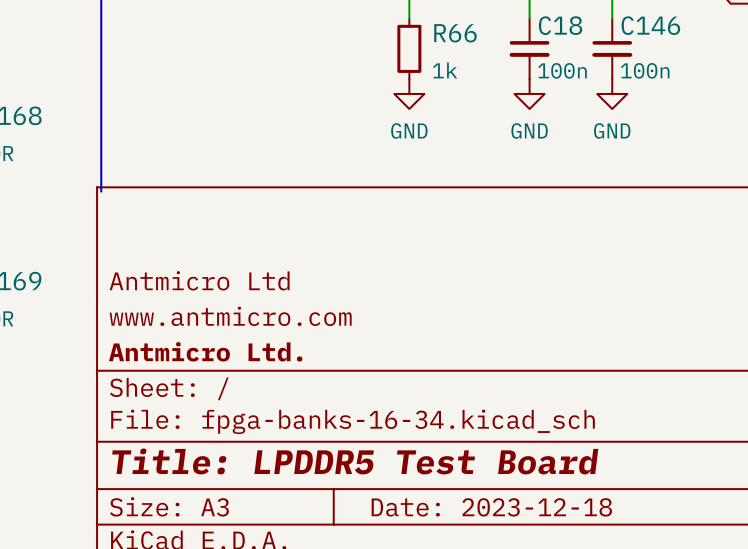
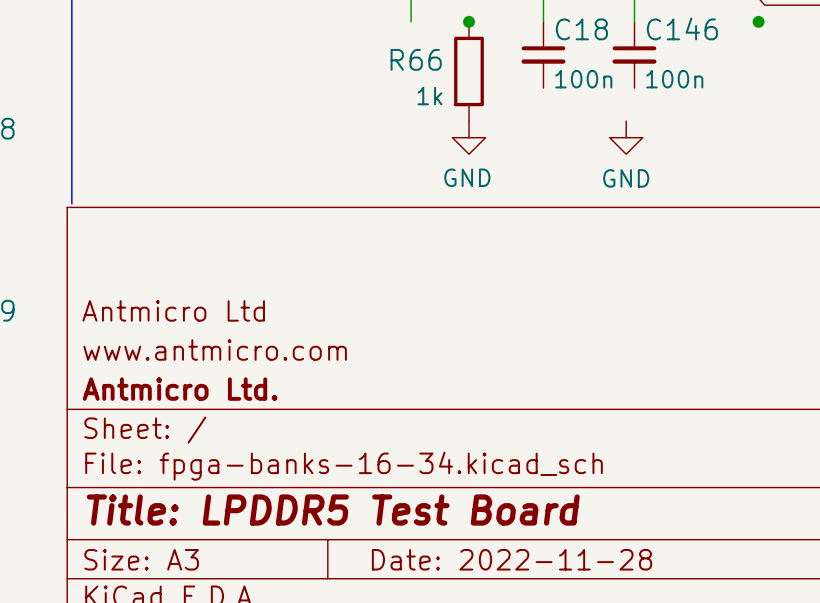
R66 symbol: [397, 18, 422, 79] -> [454, 21, 484, 122]
junction: none -> (469, 21)
junction: none -> (758, 21)
R66 name position: R66 (455, 33) -> R66 (416, 59)
R66 text position: 1k (445, 70) -> 1k (429, 96)
power symbol: GND (409, 93) -> none
power symbol: GND (529, 93) -> none
power symbol position: GND (612, 93) -> GND (626, 137)
power symbol: none -> GND (469, 137)
line: (101, 184) (101, 191) -> none
title block: Date: 2023-12-18 (491, 507) -> Date: 2022-11-28 (512, 559)

